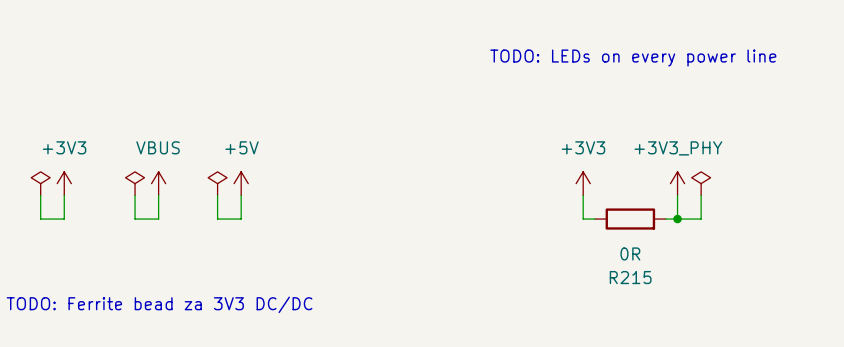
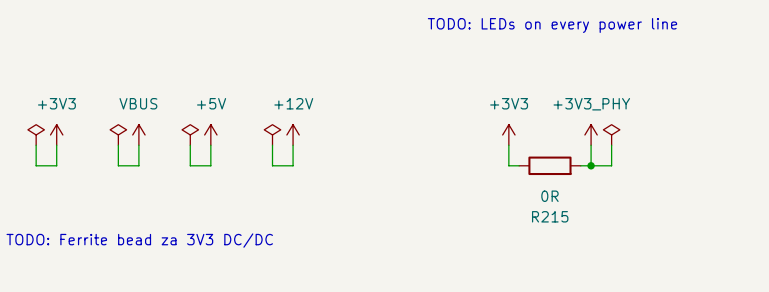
power symbol: none -> (272, 134)
power symbol: none -> +12V (293, 134)
wire: none -> (272, 145) (272, 165) (293, 165) (293, 145)

